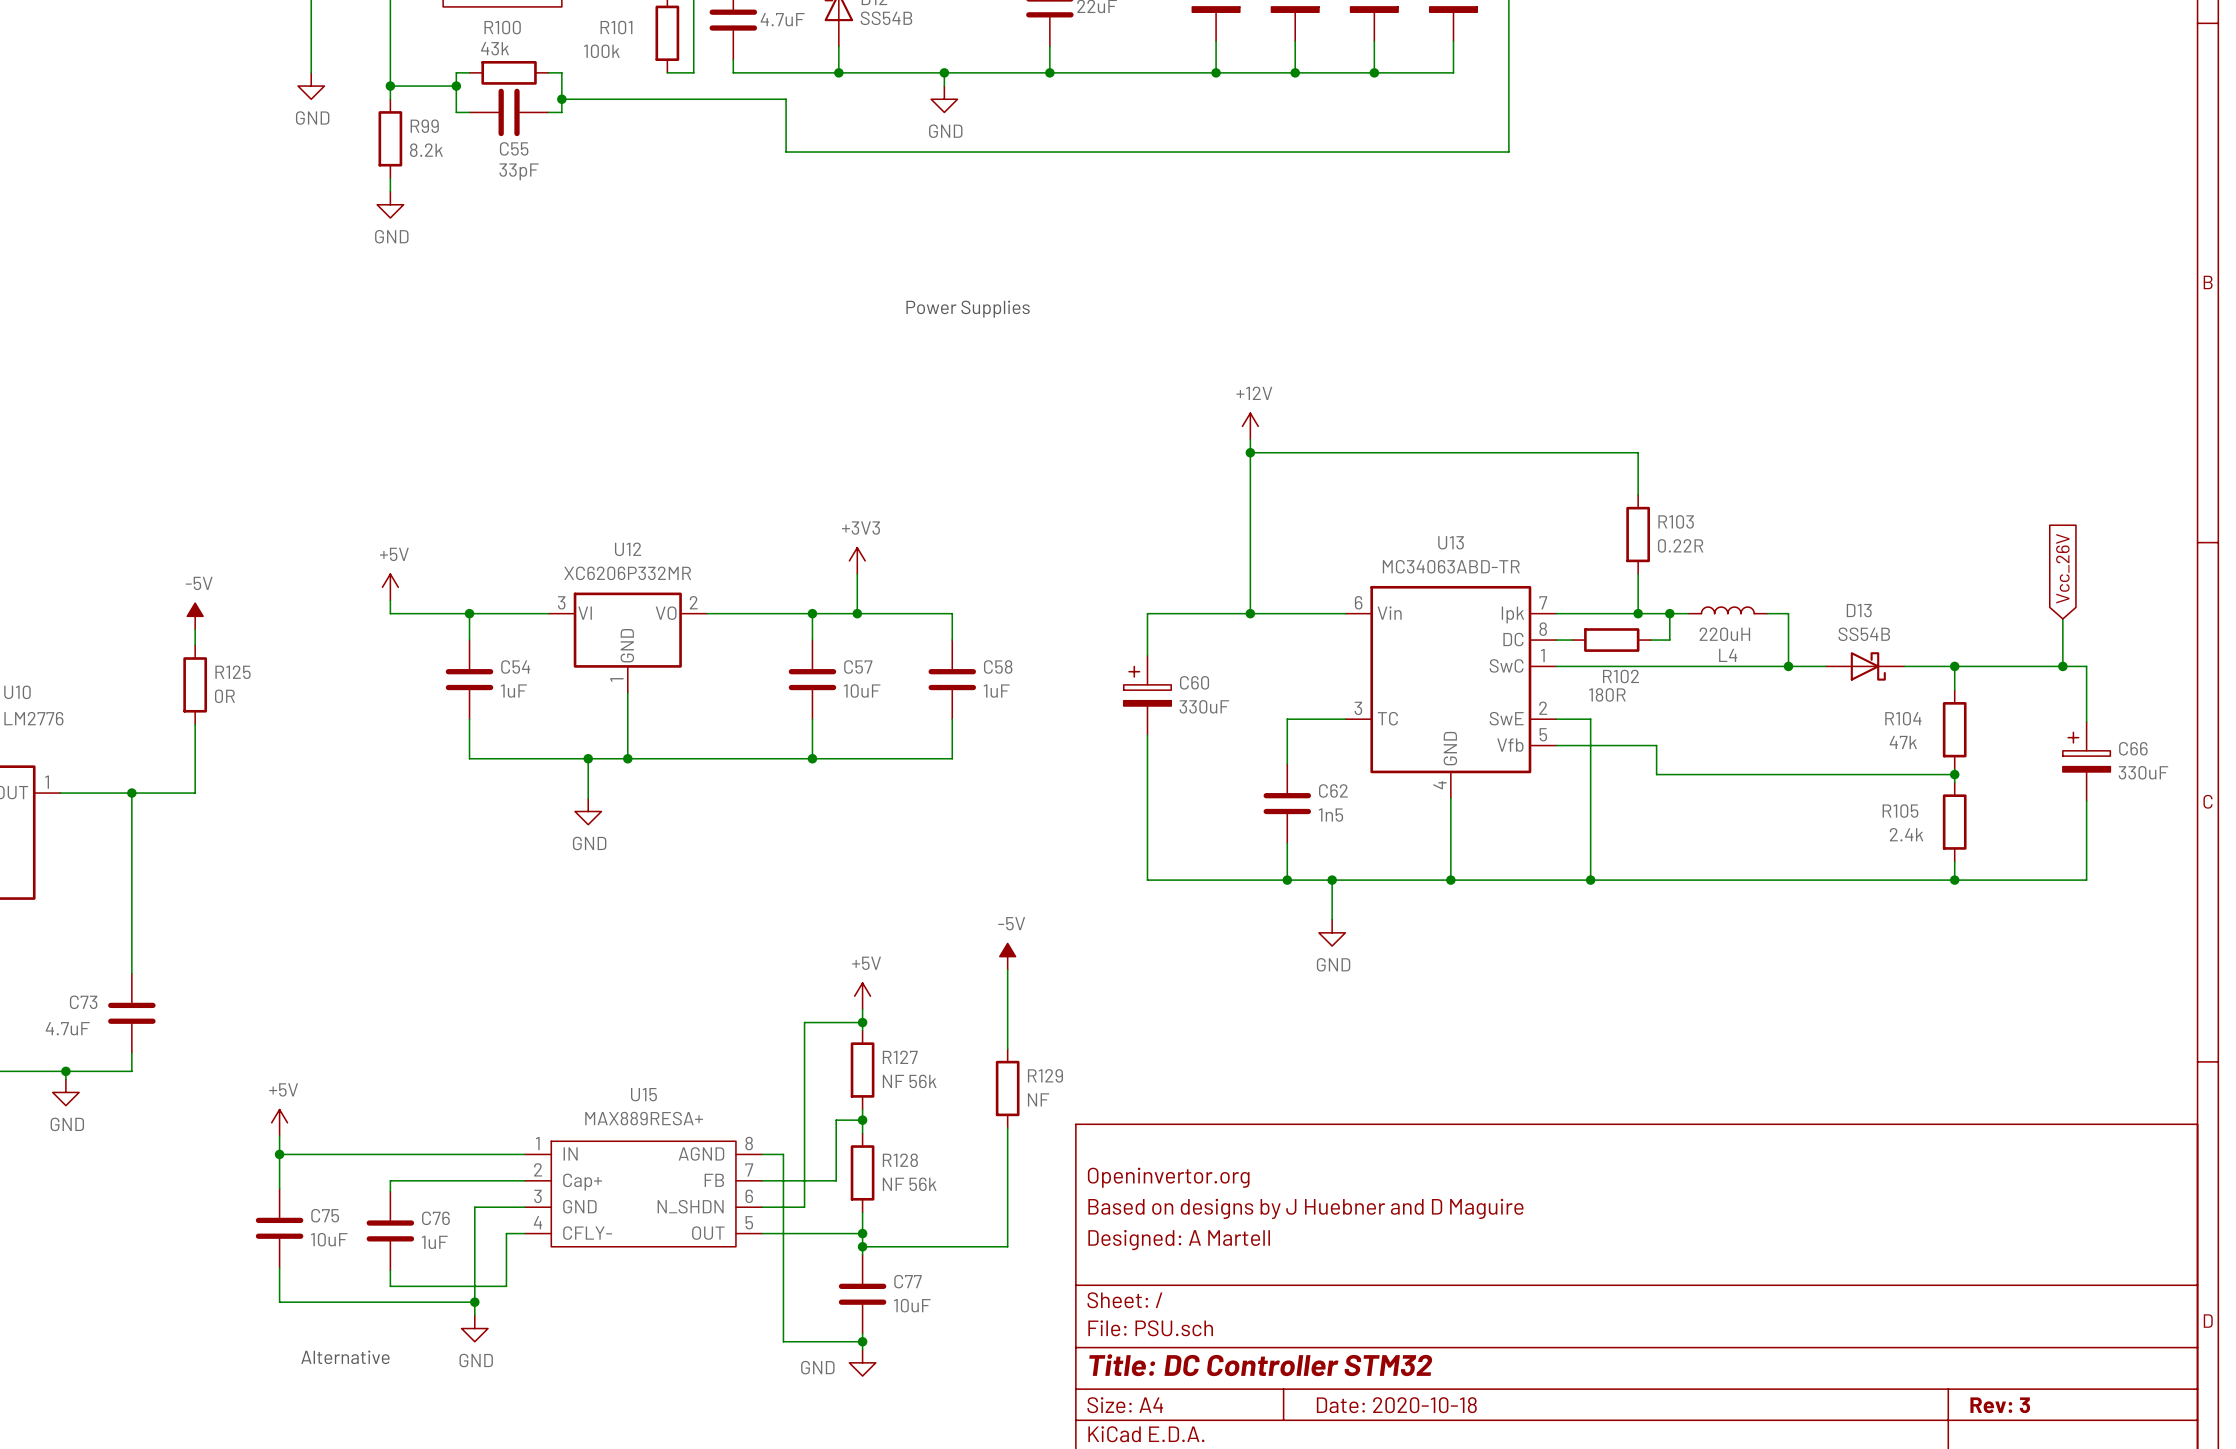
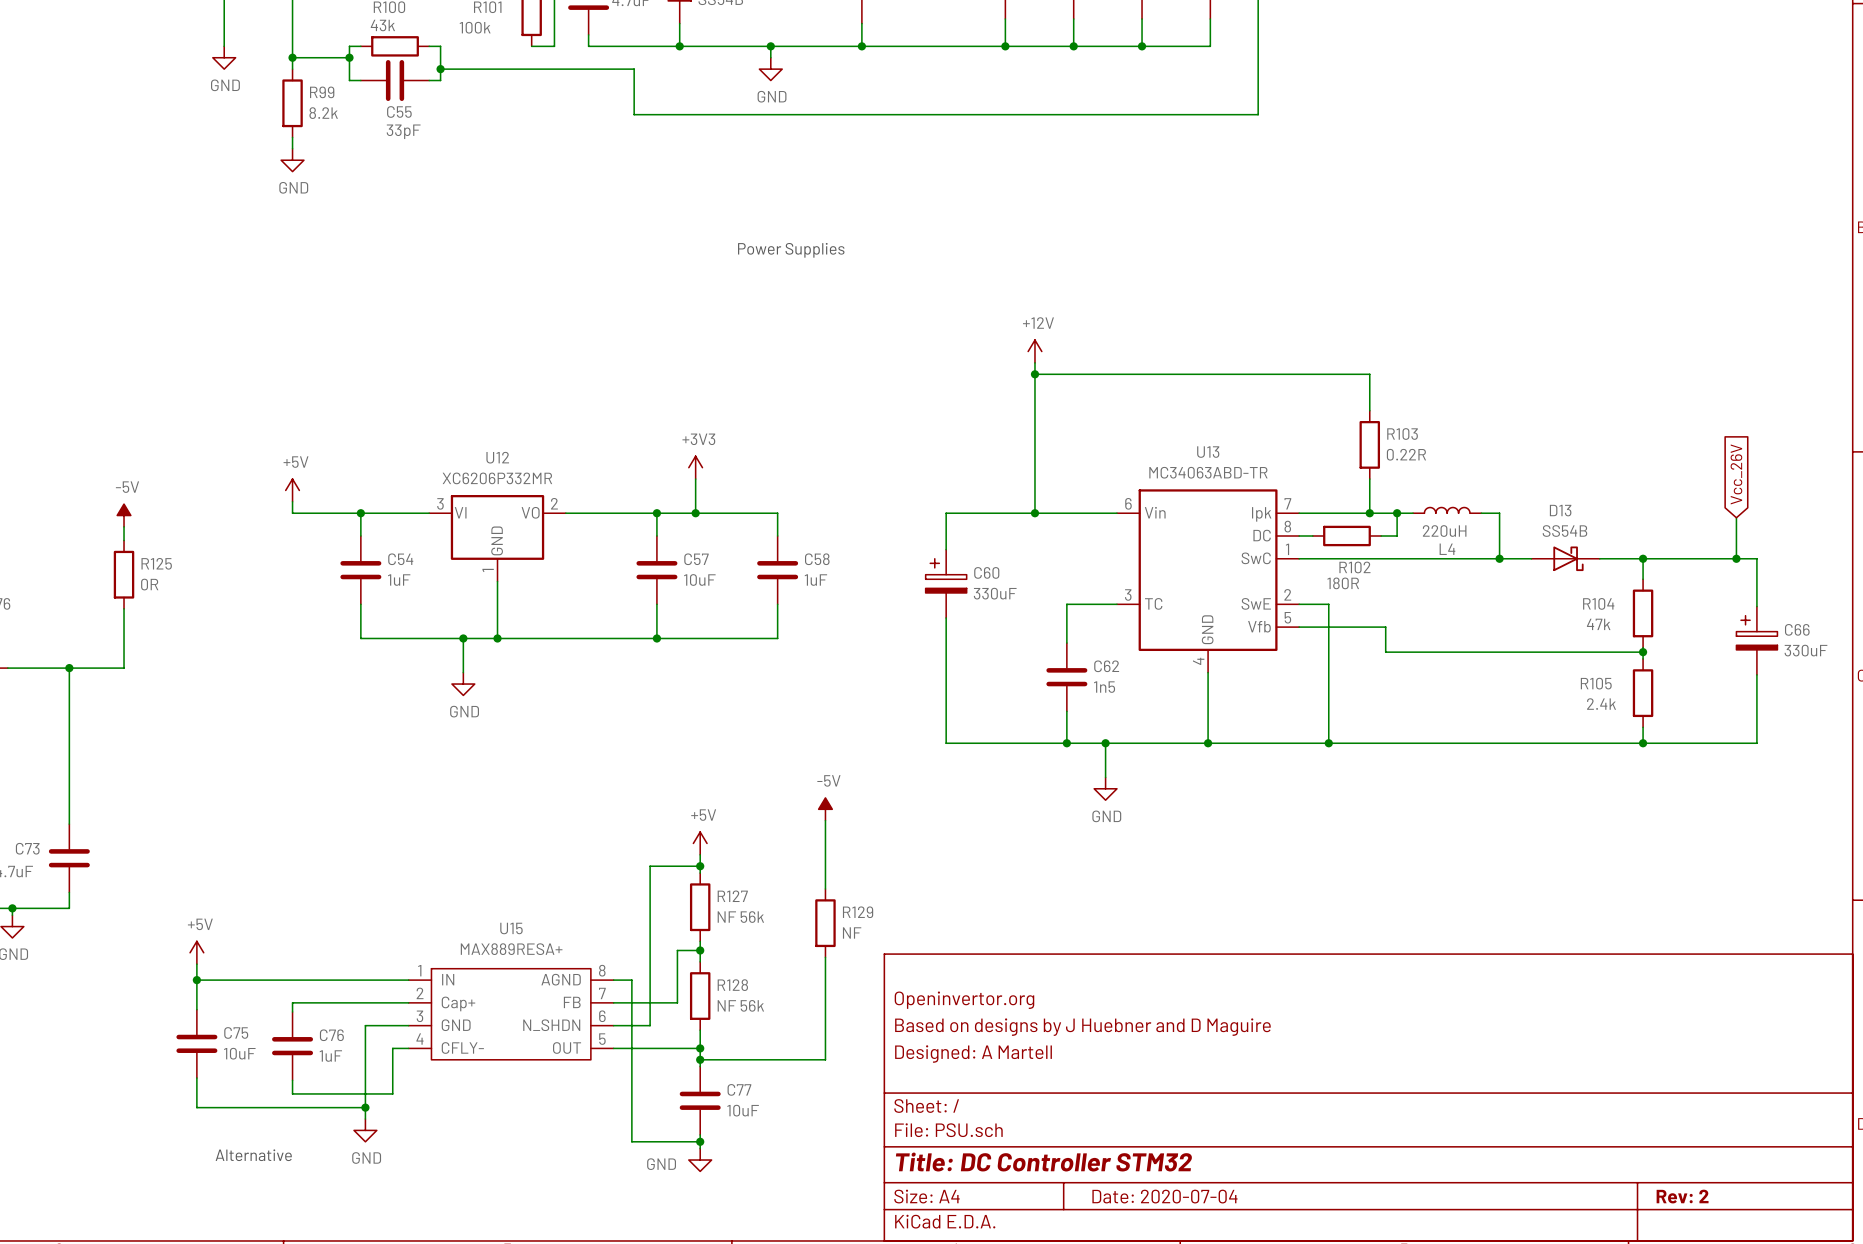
title block: Date: 2020-10-18 (1396, 1405) -> Date: 2020-07-04 (1164, 1196)
title block: Rev: 3 (2000, 1405) -> Rev: 2 (1682, 1196)

